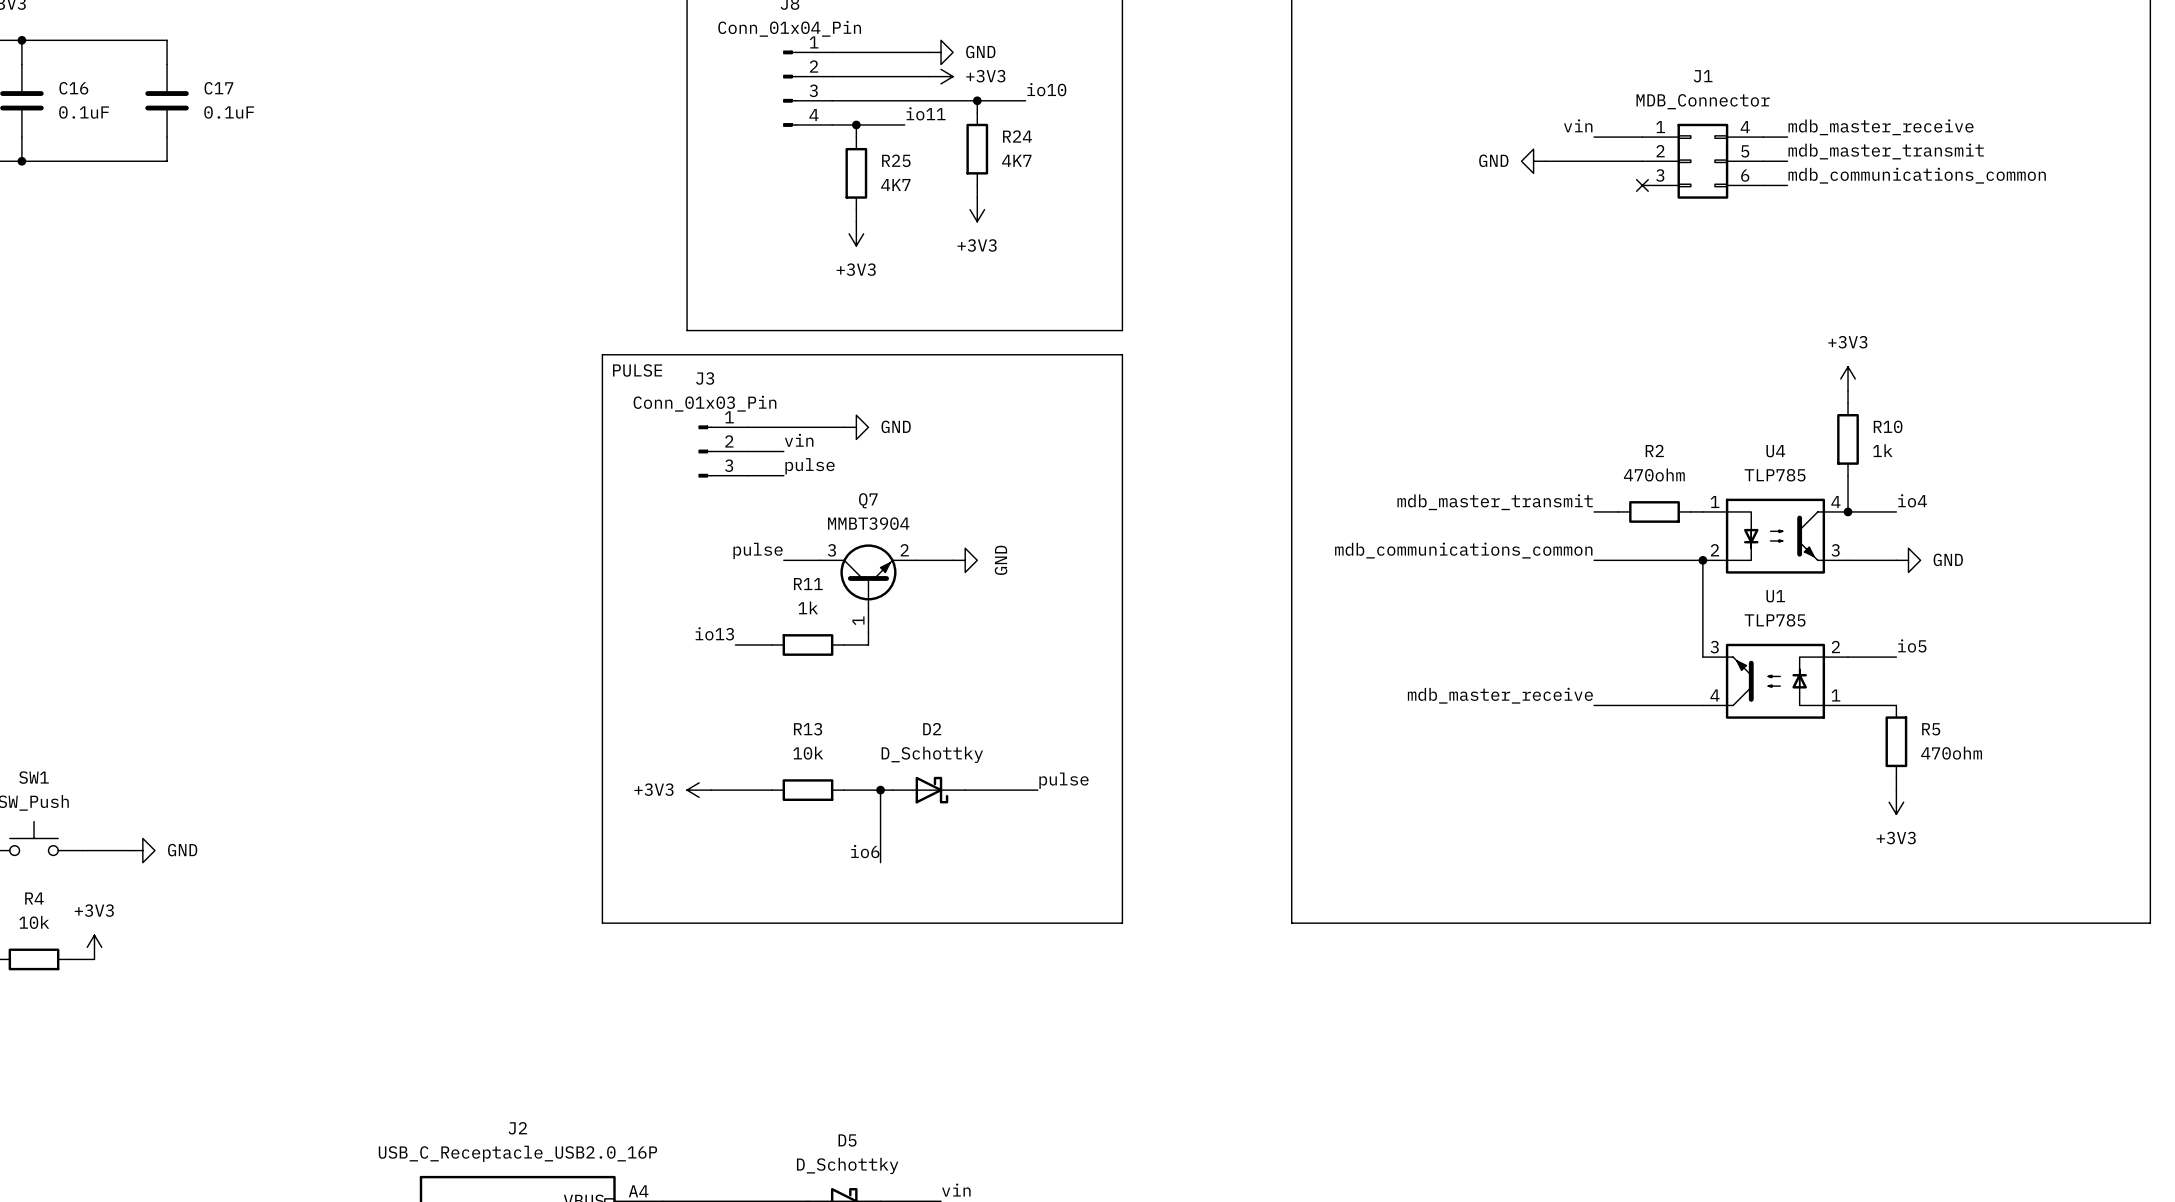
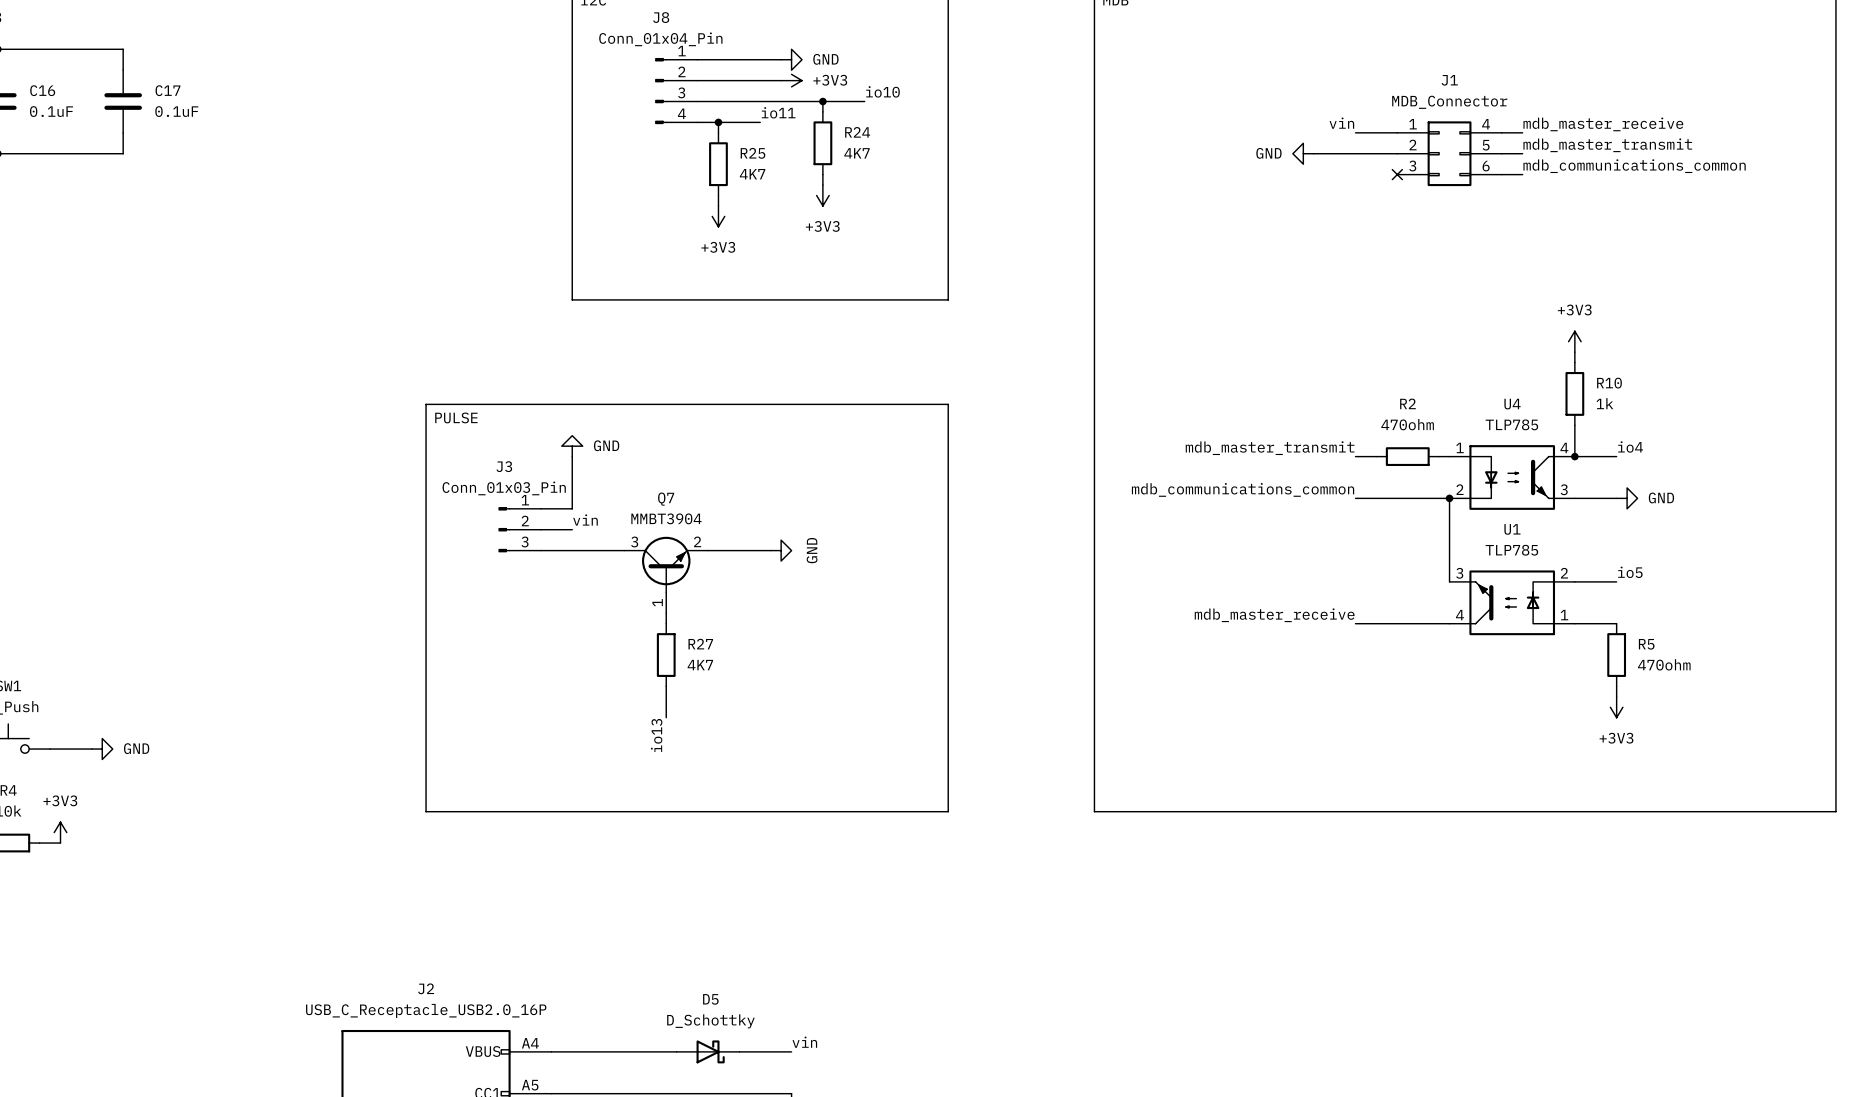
text position: PULSE (637, 370) -> PULSE (456, 417)
wire: (747, 427) (844, 427) -> (540, 550) (624, 550)
power symbol: GND (856, 427) -> none
label position: vin (799, 440) -> vin (585, 520)
J3 position: (722, 451) -> (519, 529)
line: (1122, 451) (1122, 354) (602, 354) (602, 923) -> (948, 404) (426, 404) (426, 811) (499, 811)
label: pulse (810, 466) -> none
wire: (747, 475) (783, 475) -> none
power symbol: none -> GND (572, 446)
wire: none -> (572, 456) (572, 508) (540, 508)
label: pulse (758, 550) -> none
wire: (783, 560) (820, 560) -> none
wire: (916, 560) (953, 560) -> none
power symbol position: GND (965, 560) -> GND (781, 550)
Q7 position: (868, 588) -> (666, 575)
wire: (868, 632) (868, 644) (844, 644) -> none
label rotation: 0° (714, 633) -> 90° counterclockwise (656, 735)
label position: io13 (714, 633) -> io13 (656, 735)
wire: (735, 644) (771, 644) -> (540, 529) (572, 529)
R11: 1k (807, 644) -> none
wire: none -> (666, 613) (666, 623)
R27: none -> 4K7 (666, 655)
wire: none -> (666, 686) (666, 717)
label: pulse (1063, 780) -> none
power symbol: +3V3 (699, 790) -> none
wire: (711, 790) (771, 790) -> none
R13: 10k (807, 790) -> none
wire: (844, 790) (892, 790) -> none
wire: (880, 790) (880, 862) -> none
junction: (880, 790) -> none
D2: D_Schottky (928, 790) -> none
wire: (965, 790) (1037, 790) -> (708, 550) (770, 550)
label: io6 (865, 851) -> none

